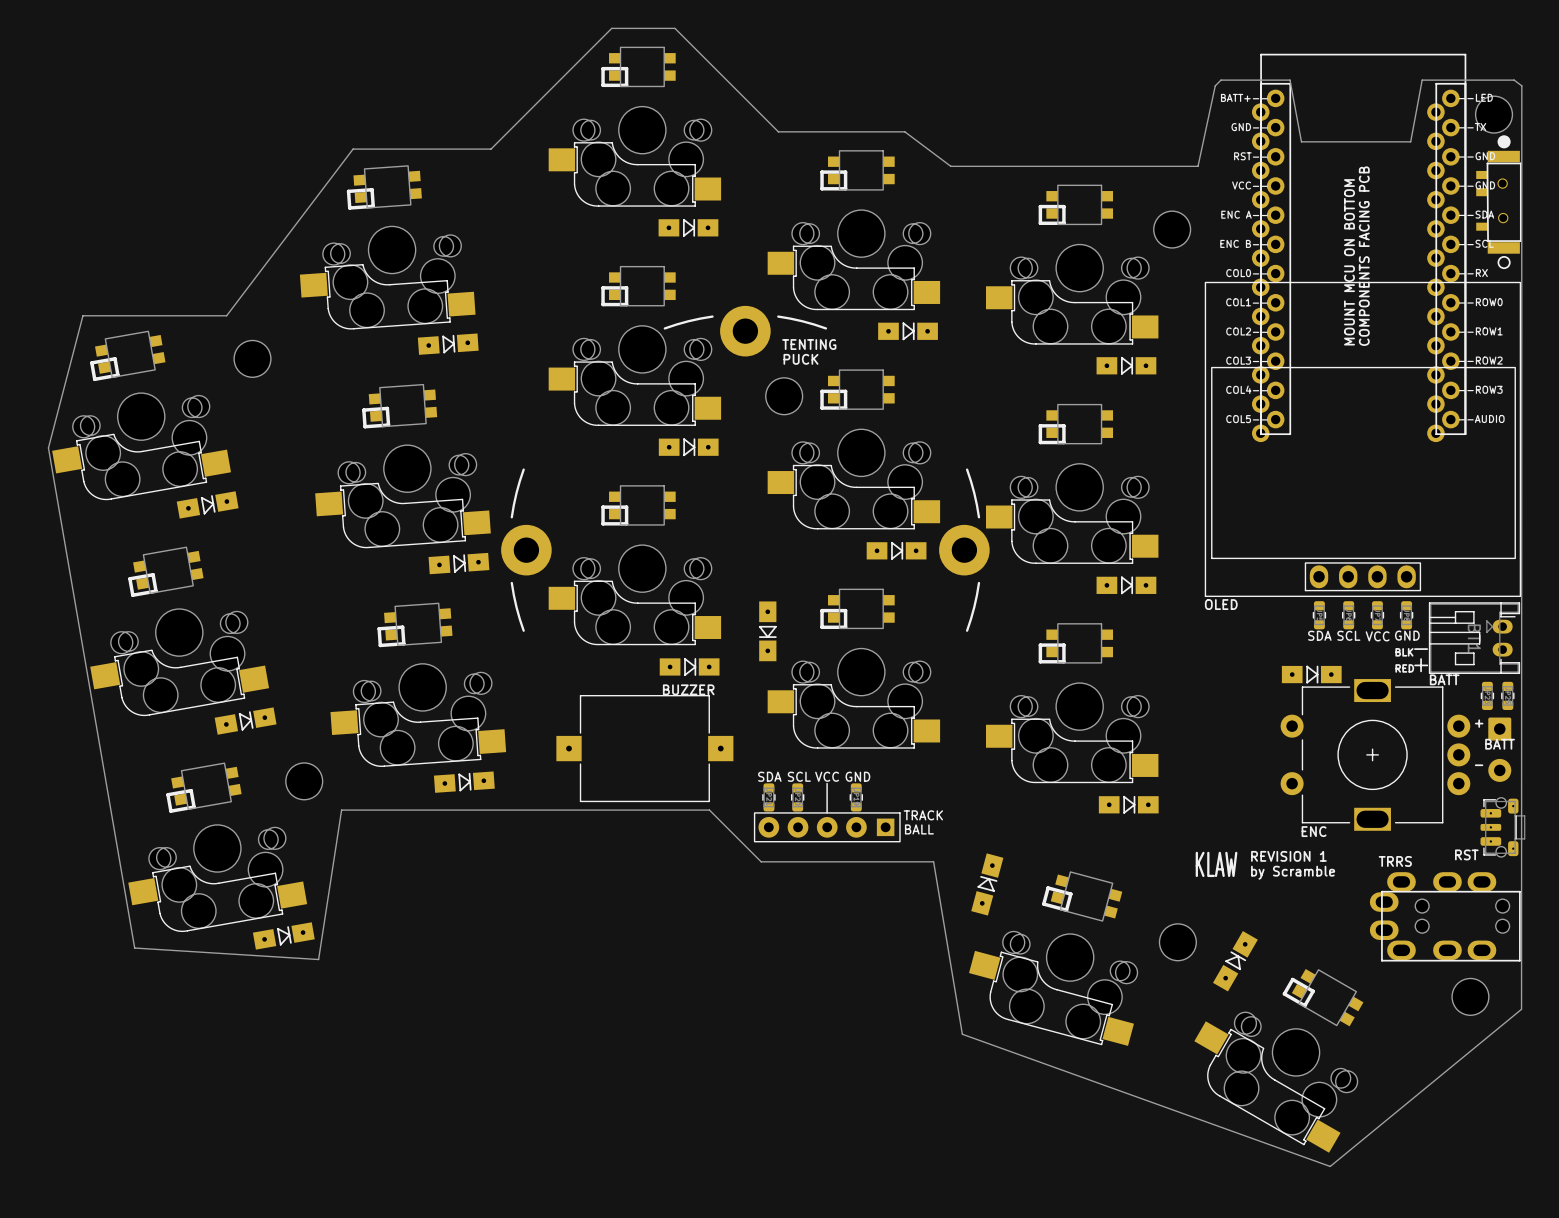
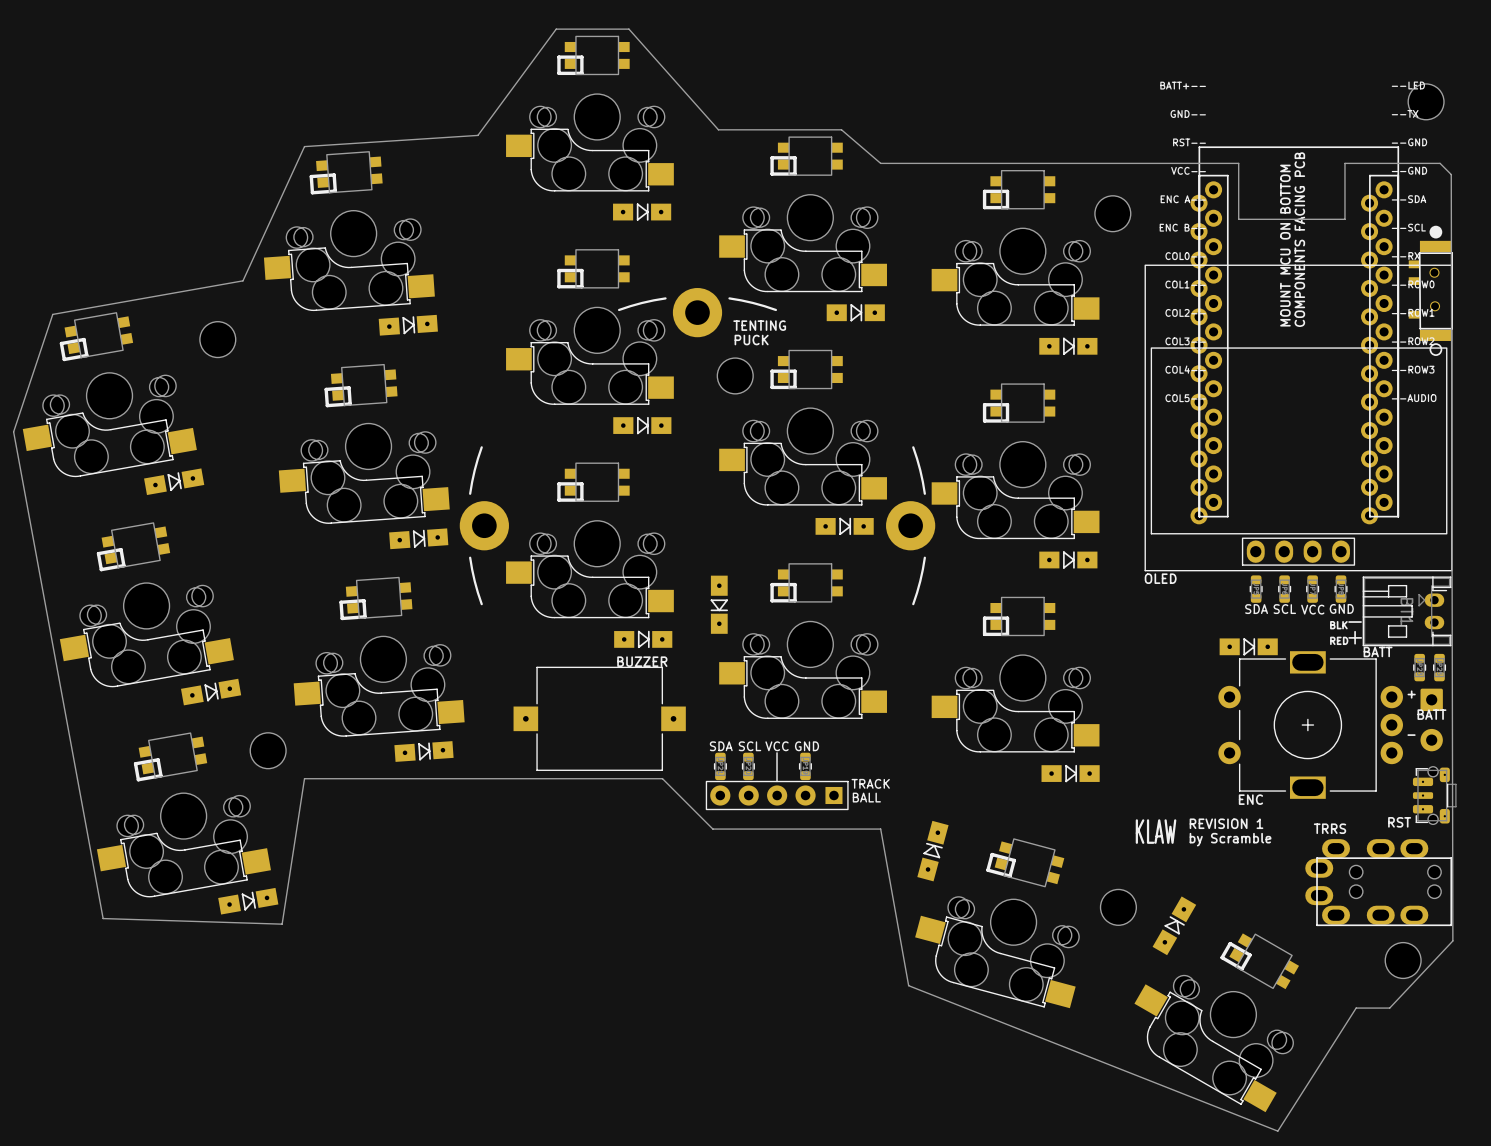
drawing position: (1504, 141) -> (1435, 232)
part position: (1498, 202) -> (1430, 290)
part position: (1359, 247) -> (1294, 335)
drawing position: (1504, 262) -> (1435, 349)
board edge: (933, 861) (962, 1034) (1330, 1166) (1521, 1009) (1521, 85) (1514, 80) (1422, 80) (1410, 141) (1301, 141) (1289, 80) (1221, 80) (1215, 85) (1198, 166) (950, 166) (904, 131) (778, 131) (674, 28) (611, 28) (491, 149) (353, 149) (226, 315) (82, 315) (48, 447) (134, 948) (318, 959) -> (880, 829) (908, 985) (1277, 1131) (1356, 1008) (1389, 1008) (1452, 940) (1451, 174) (1440, 163) (1344, 163) (1344, 219) (1238, 219) (1238, 163) (880, 163) (841, 129) (718, 129) (628, 29) (556, 29) (477, 135) (304, 146) (242, 280) (52, 314) (13, 431) (103, 918) (282, 924)

